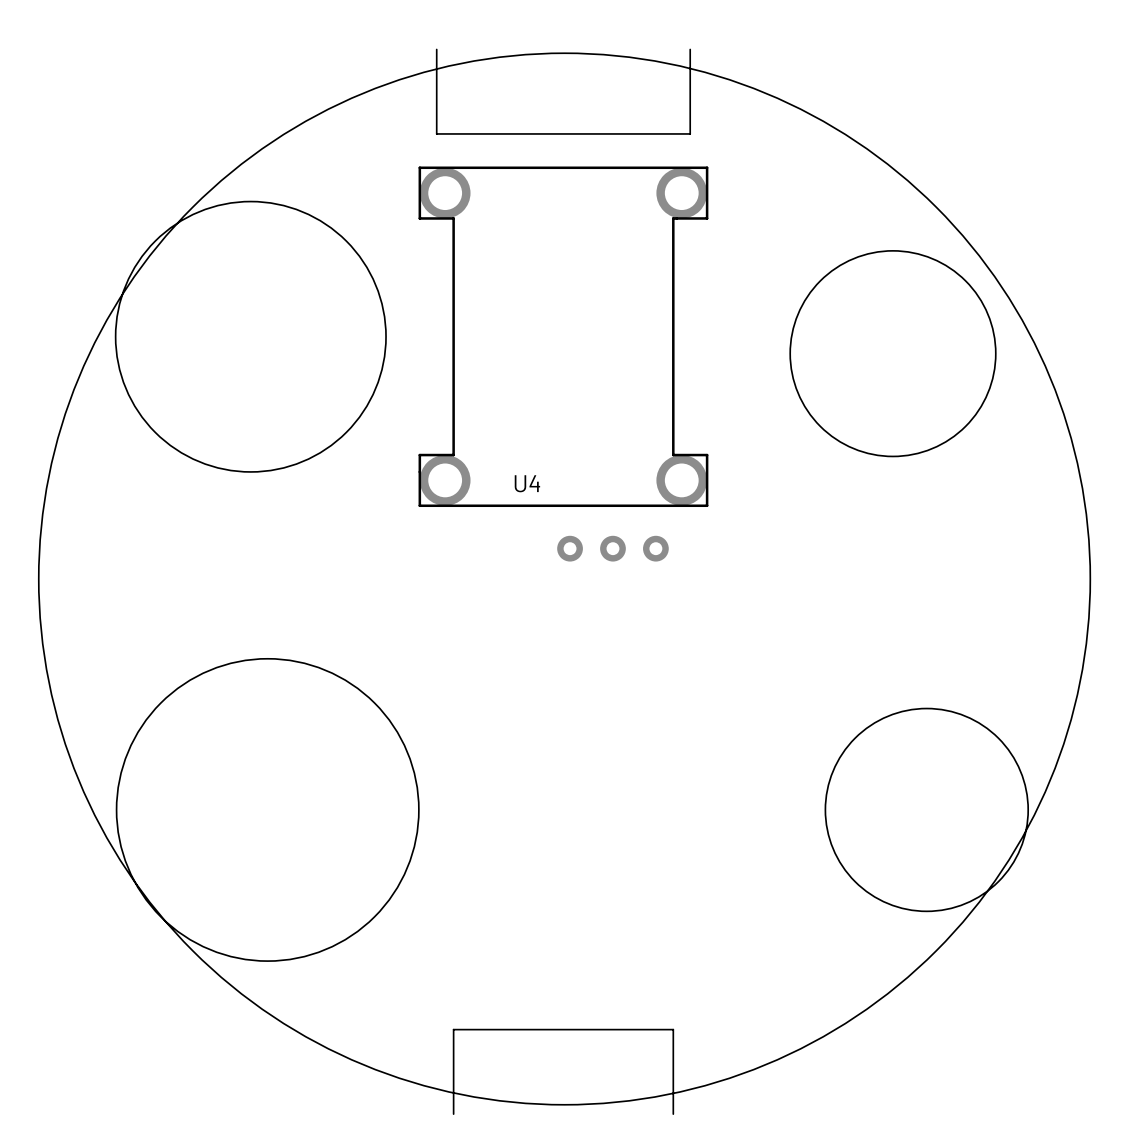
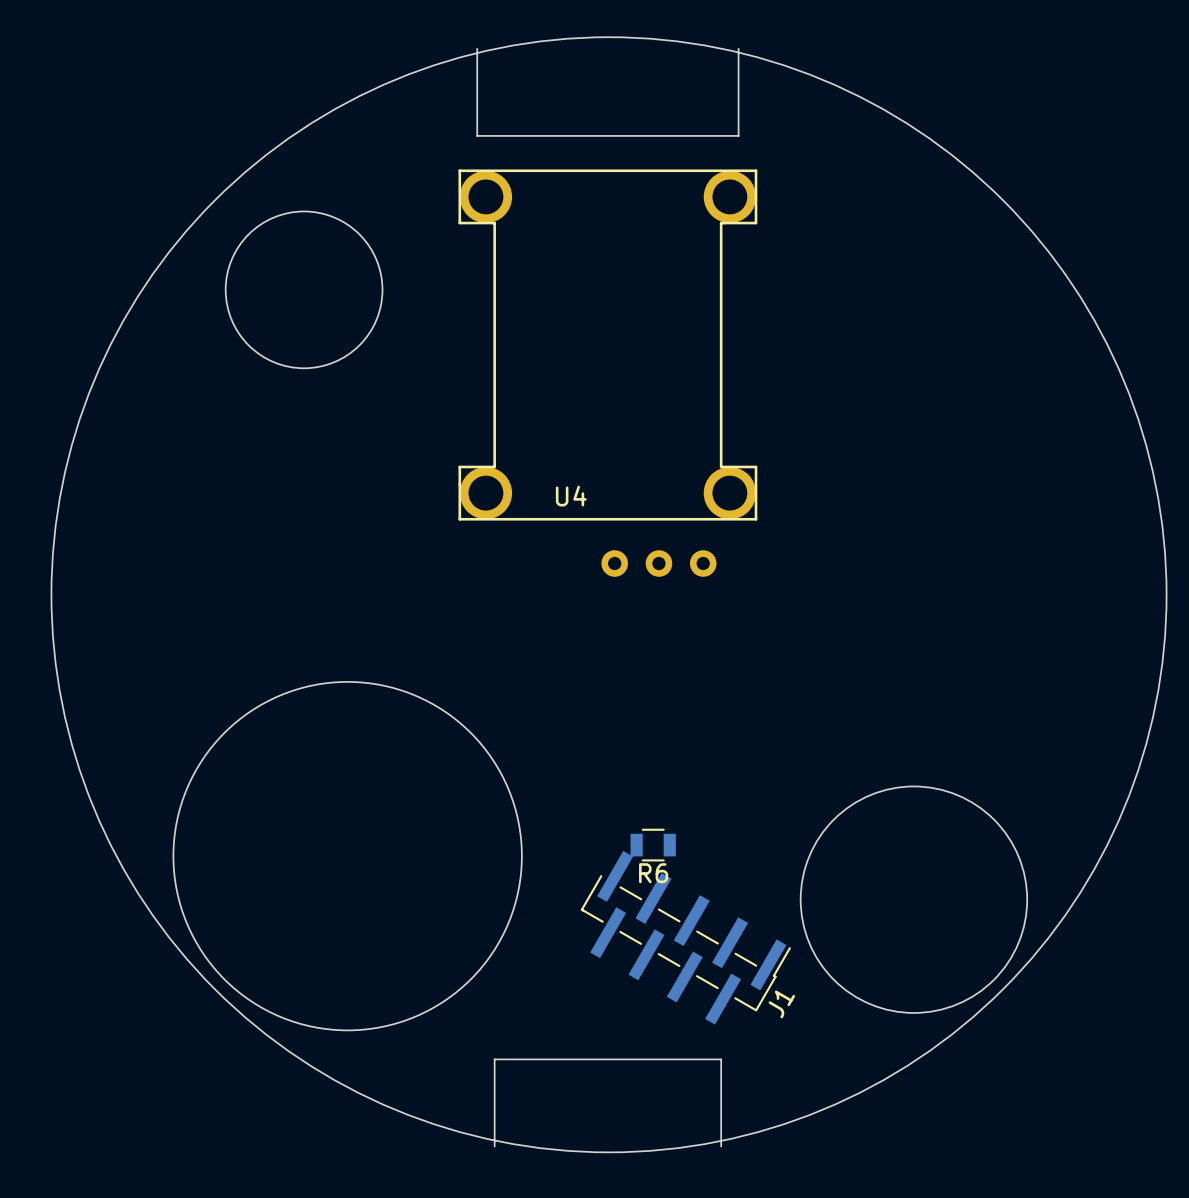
round board edge size: [37, 52, 1092, 1106] -> [50, 36, 1168, 1154]
round board edge: [114, 200, 387, 473] -> none
round board edge: none -> [224, 210, 384, 370]
round board edge: [789, 250, 997, 458] -> none
round board edge: [115, 657, 420, 962] -> none
round board edge: none -> [172, 681, 523, 1032]
round board edge: [824, 707, 1030, 913] -> none
round board edge: none -> [799, 785, 1029, 1014]
R6: none -> (653, 845)
J1: none -> (685, 937)

